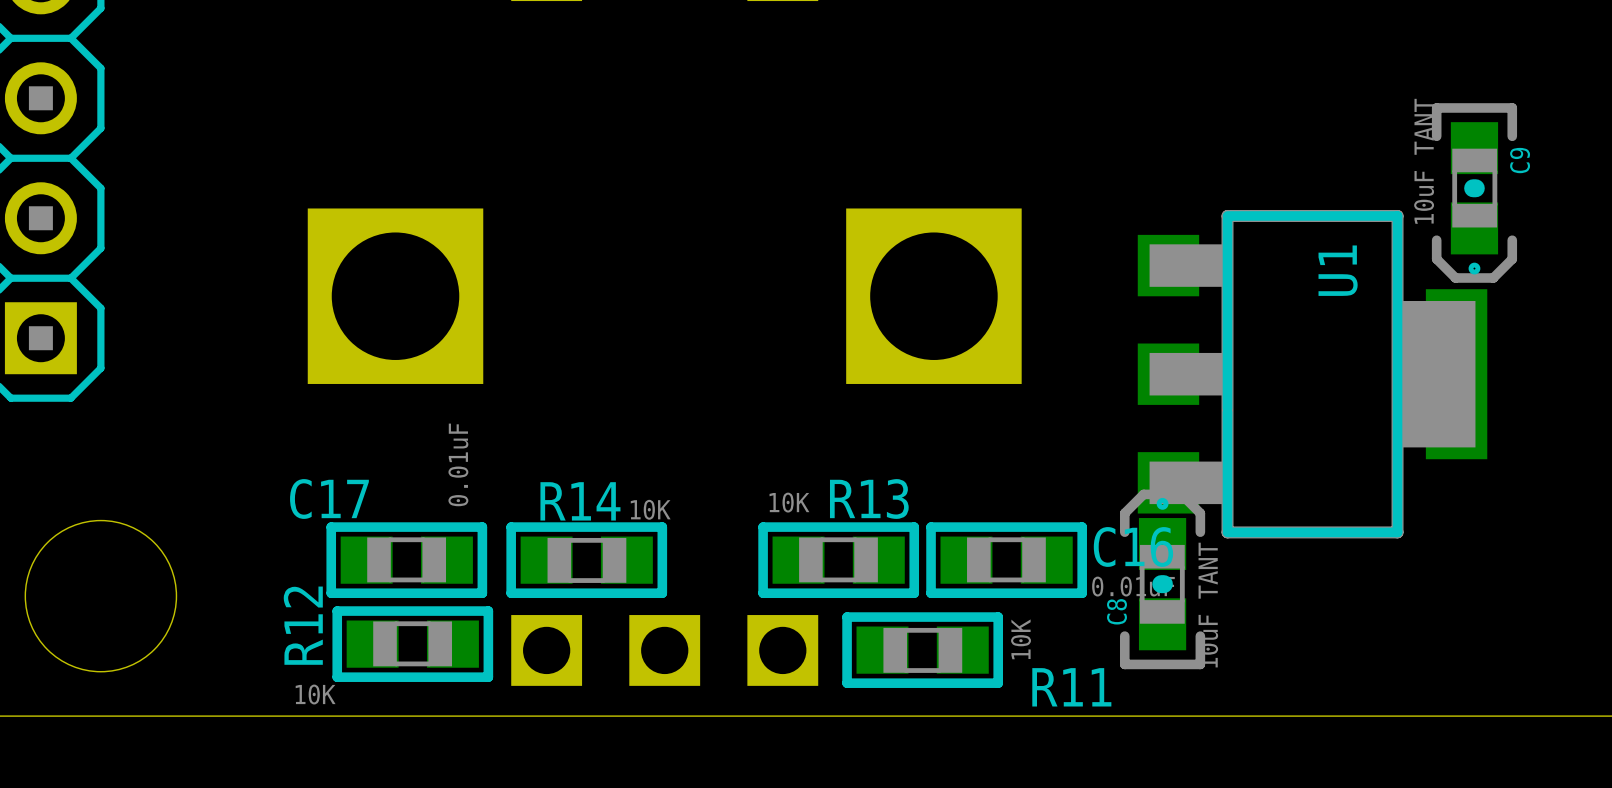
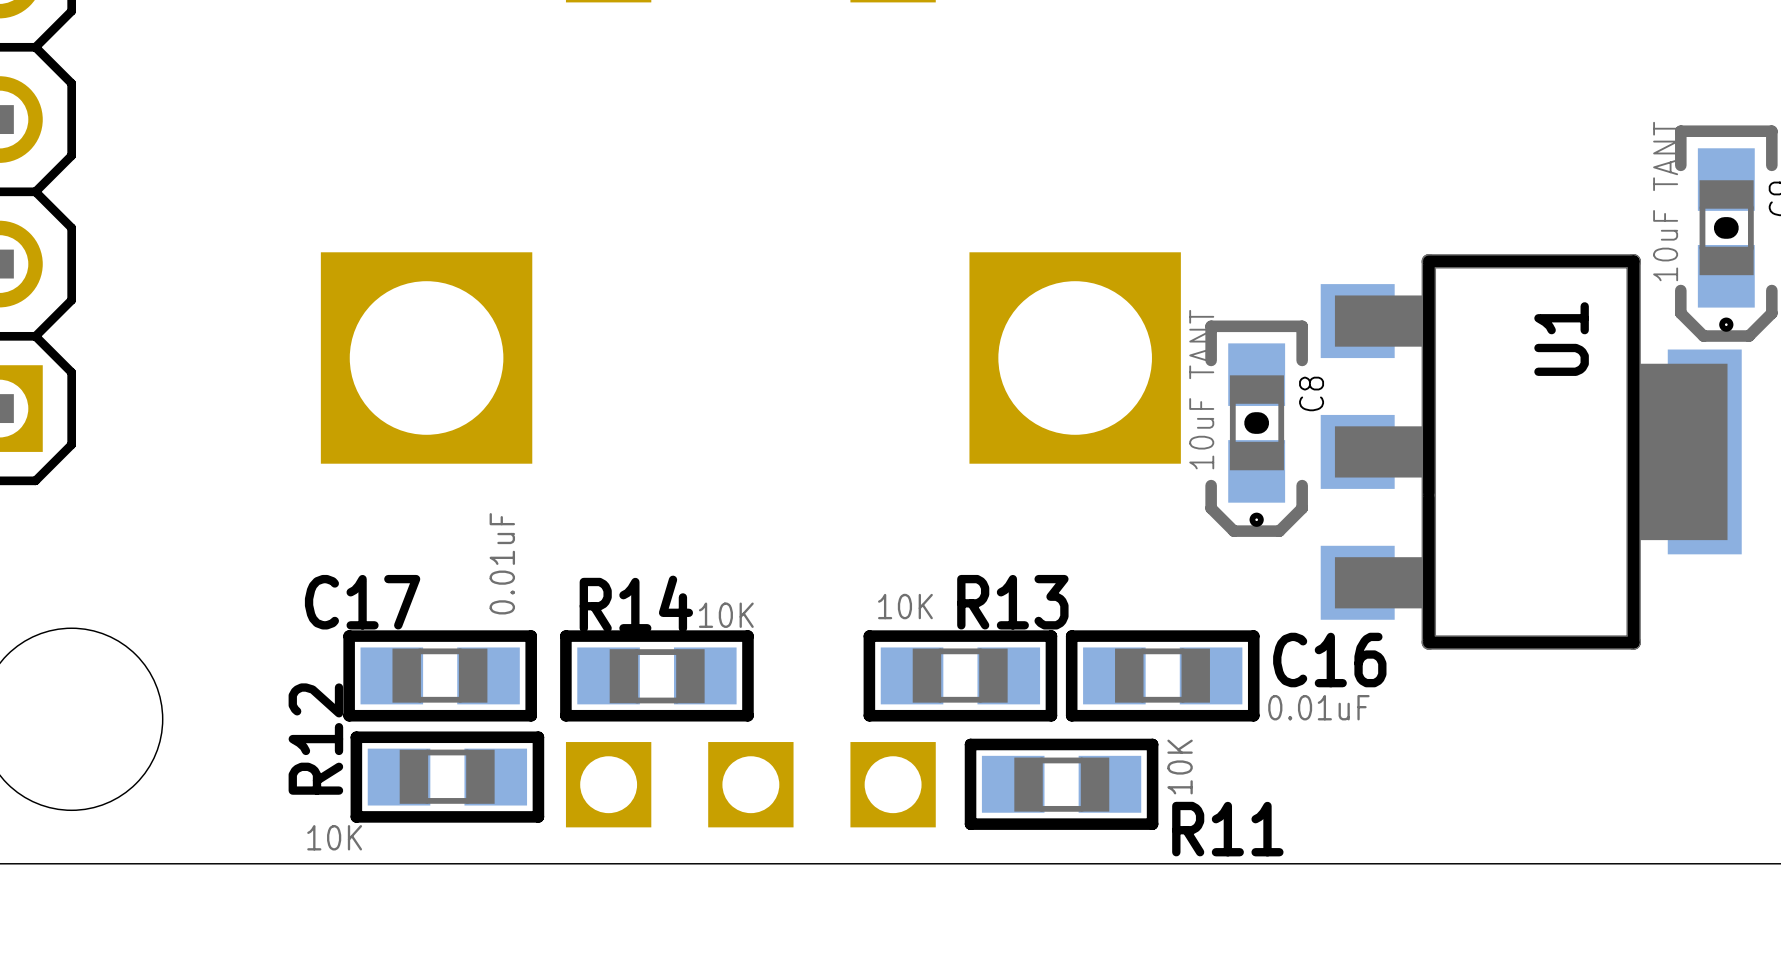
C8 rotation: 0° (1162, 579) -> 180° (1256, 428)
C8 position: (1162, 579) -> (1256, 428)

